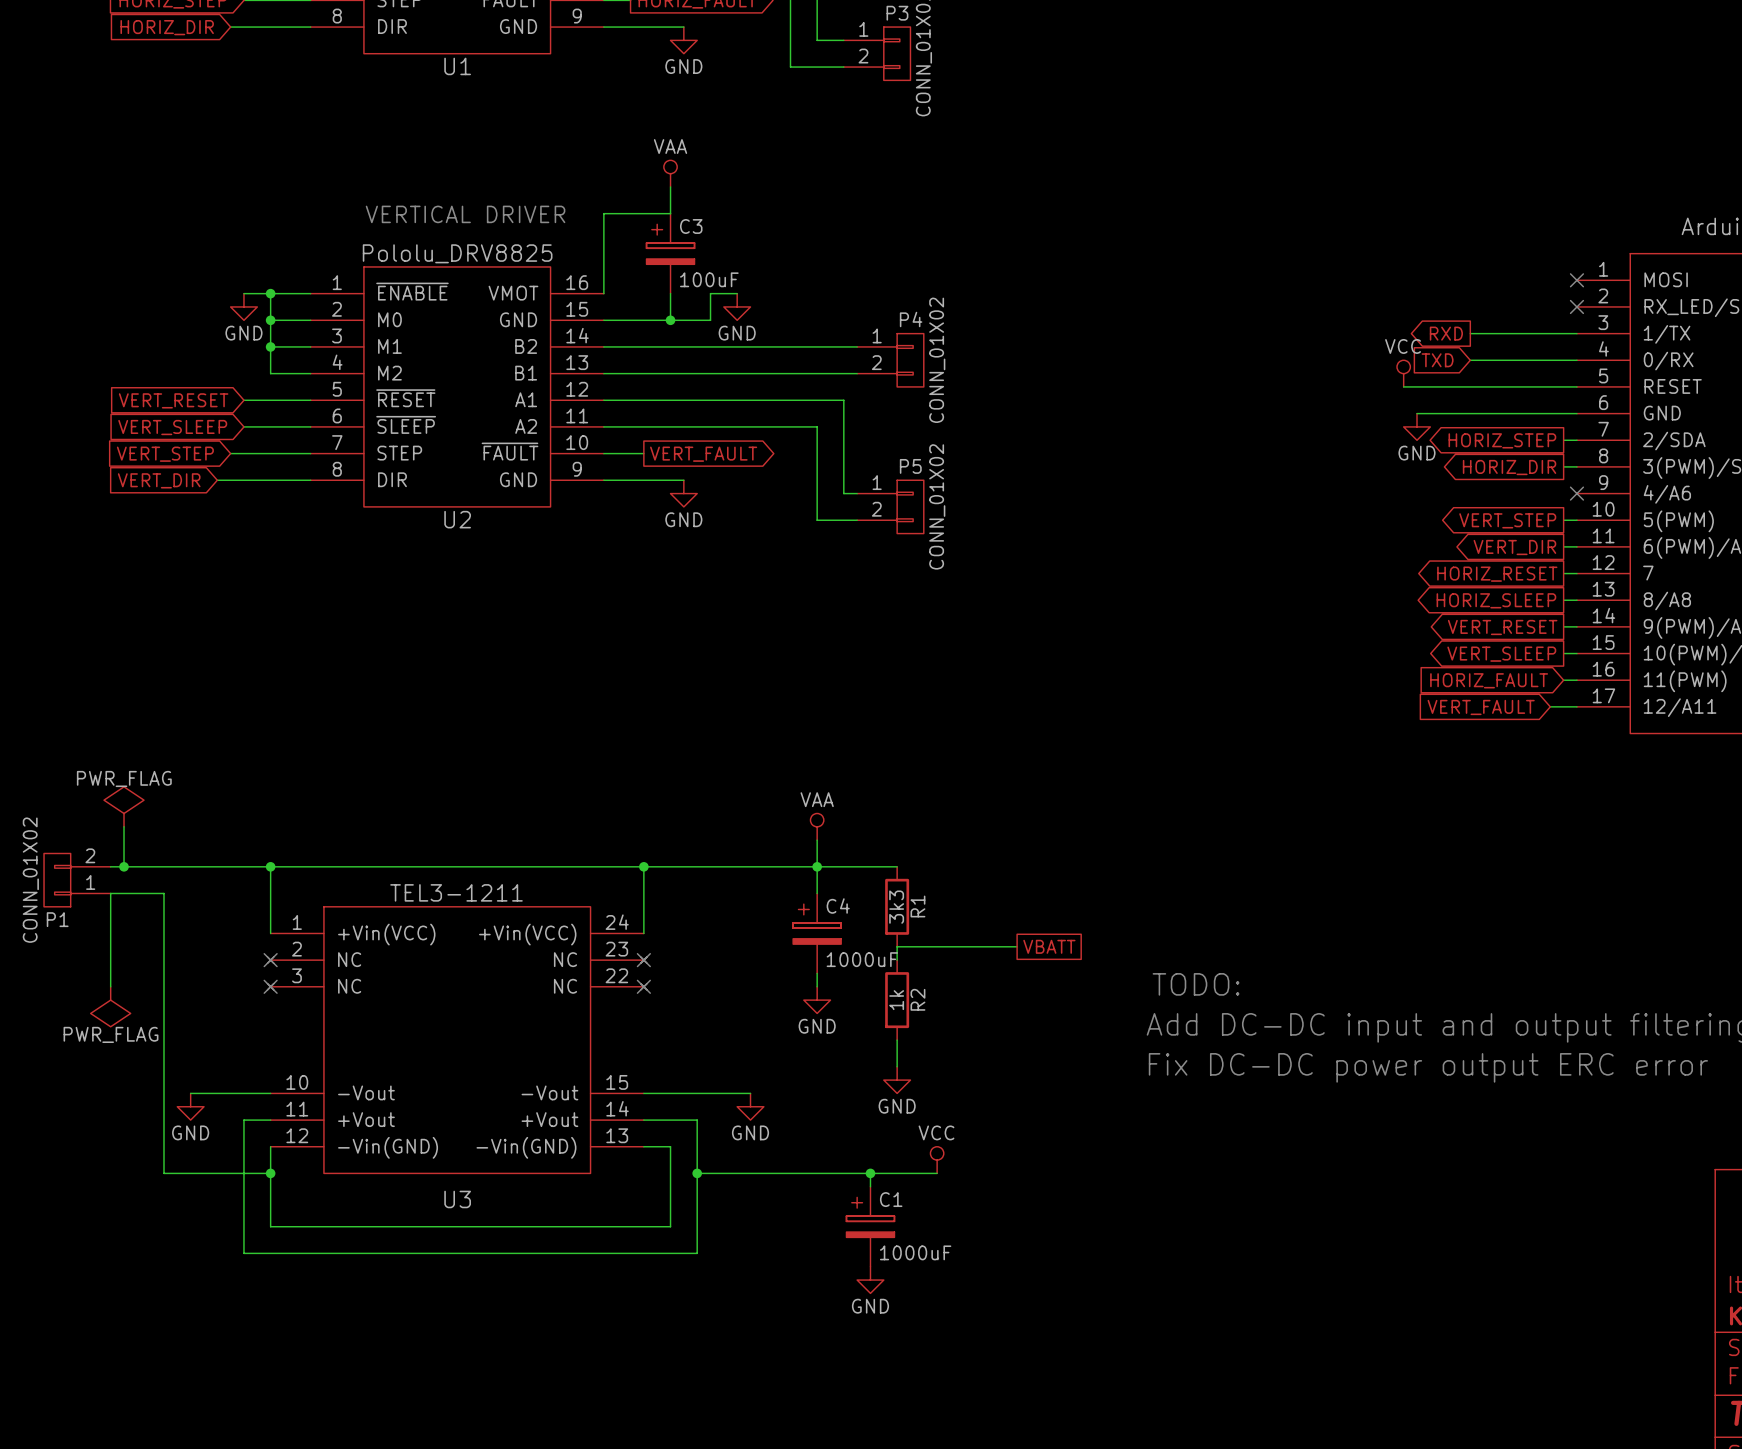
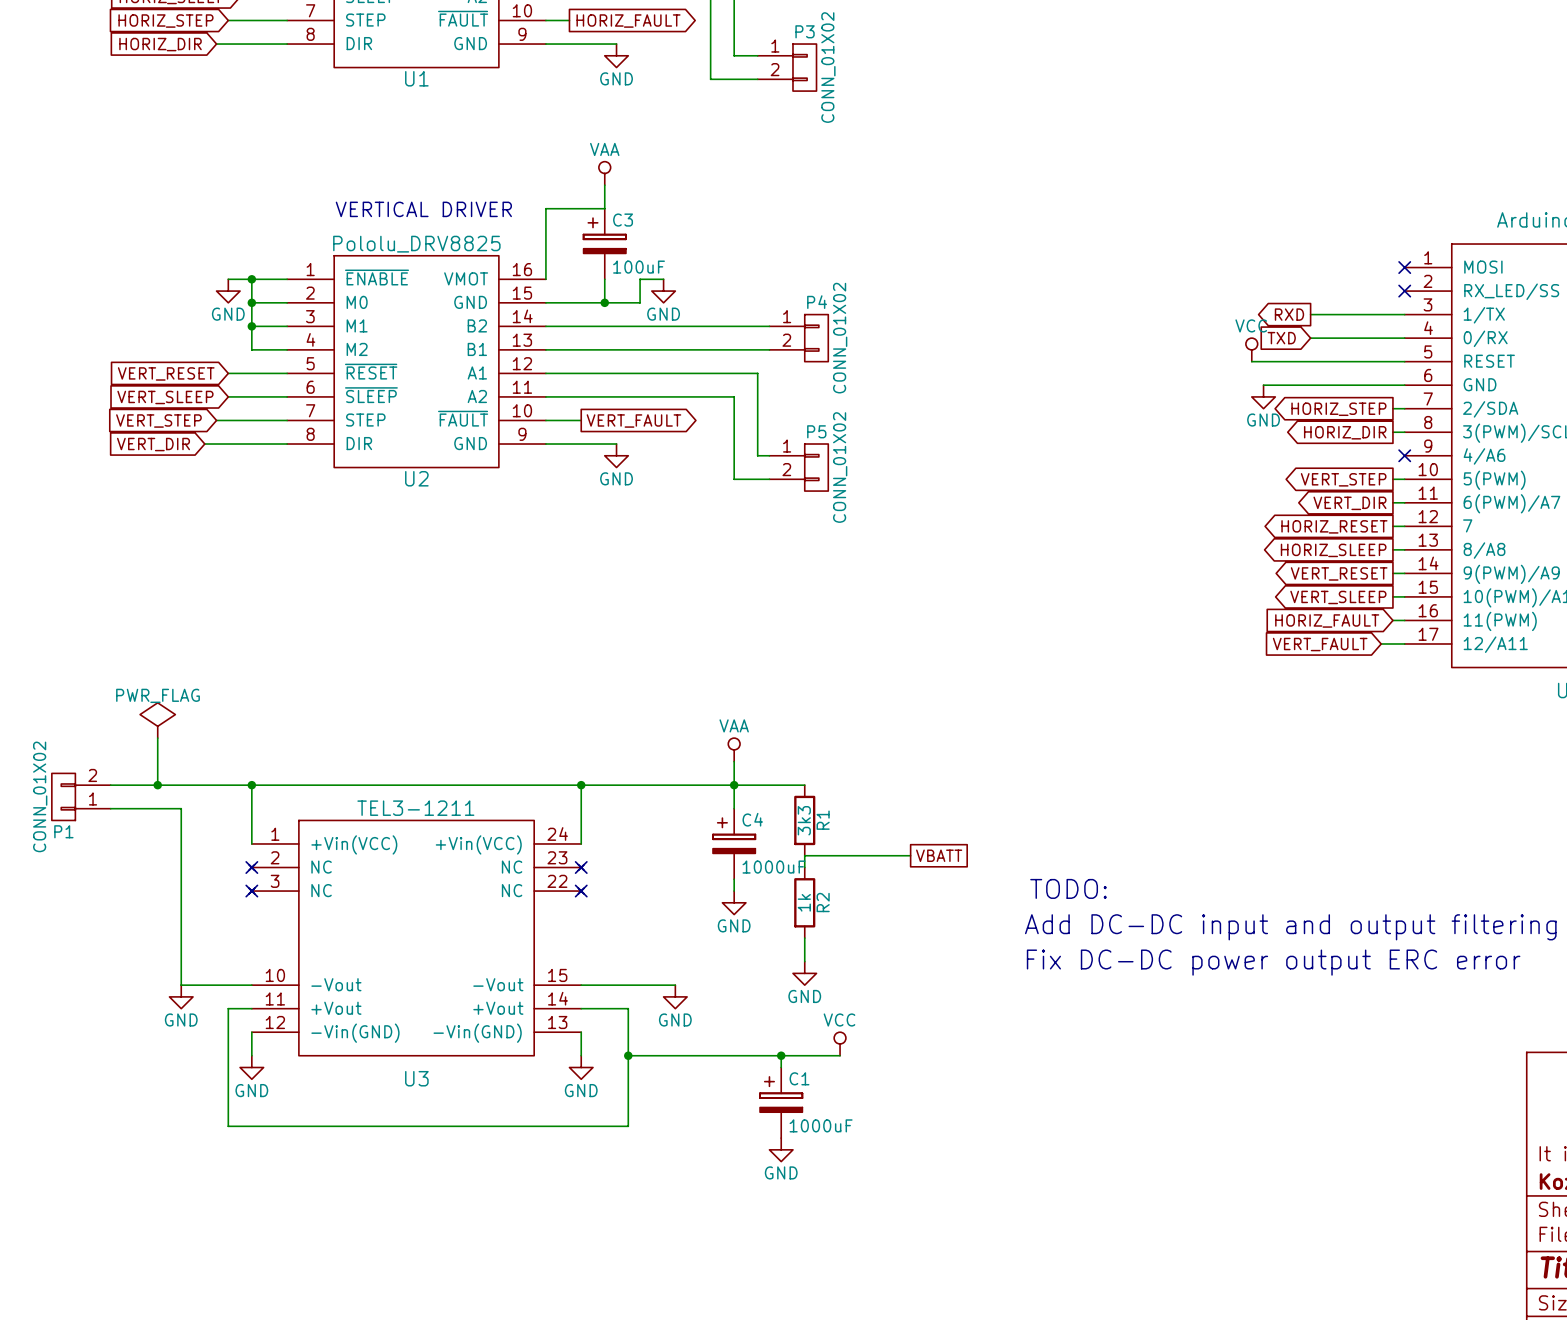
power symbol position: PWR_FLAG (124, 806) -> PWR_FLAG (157, 720)
wire: none -> (157, 738) (157, 785)
wire: (124, 826) (124, 866) -> none
junction position: (124, 866) -> (157, 785)
wire: (110, 893) (110, 986) -> none
wire: (163, 893) (163, 1173) (270, 1173) (270, 1226) (670, 1226) (670, 1146) (643, 1146) -> (157, 808) (181, 808) (181, 985)
power symbol: PWR_FLAG (110, 1006) -> none
wire: none -> (581, 1032) (581, 1055)
junction: (270, 1173) -> none
power symbol: none -> GND (251, 1067)
power symbol: none -> GND (581, 1067)

